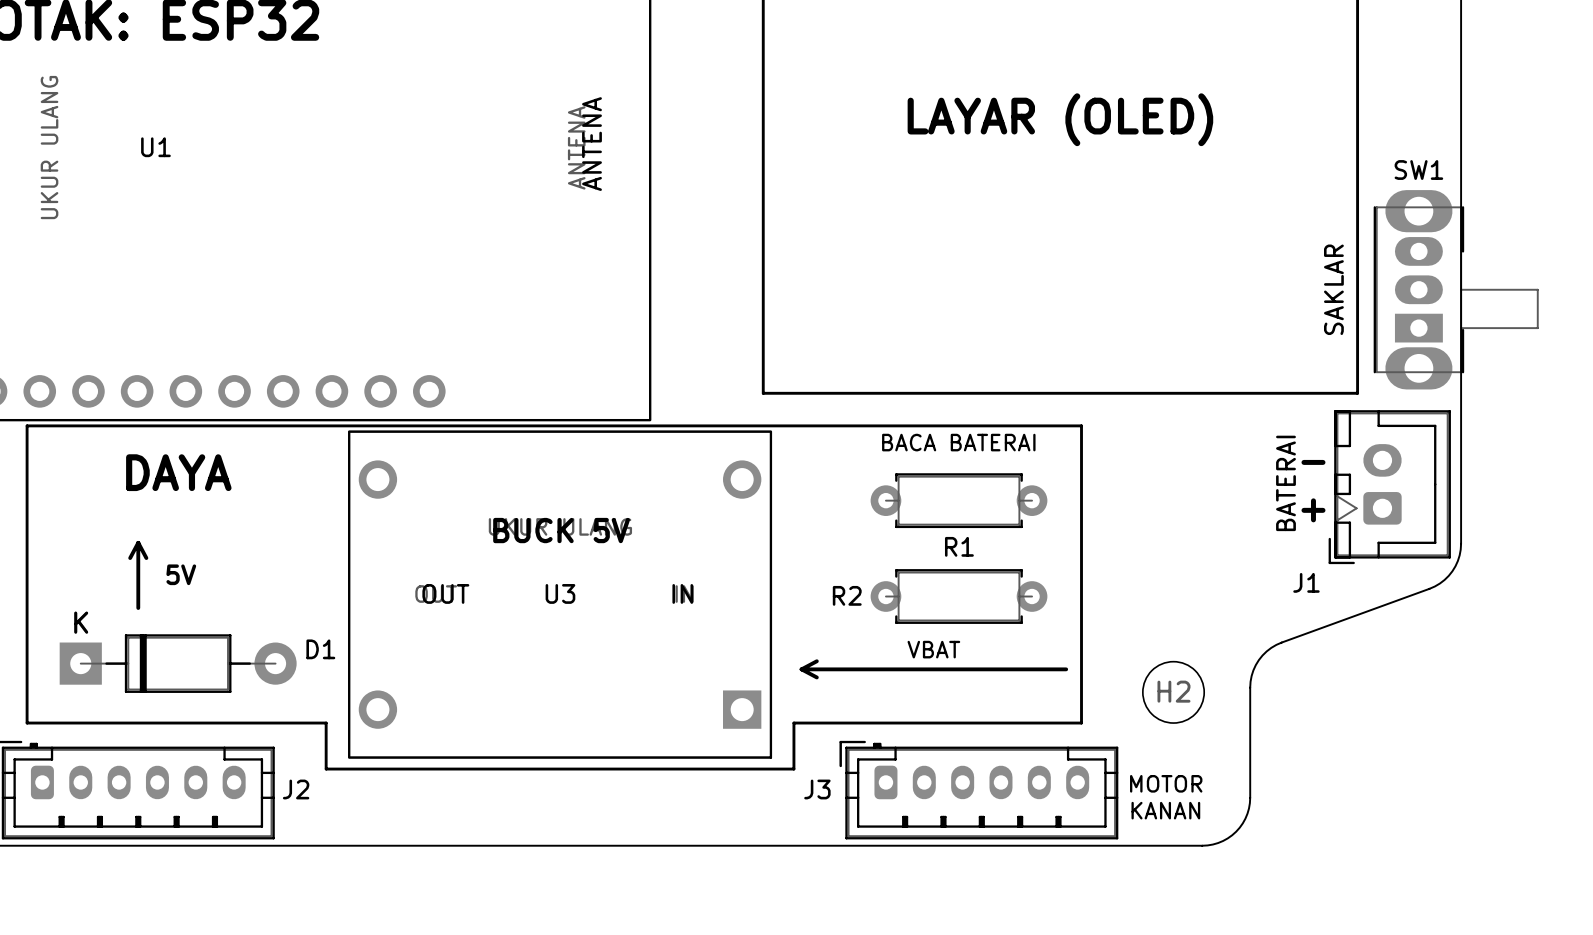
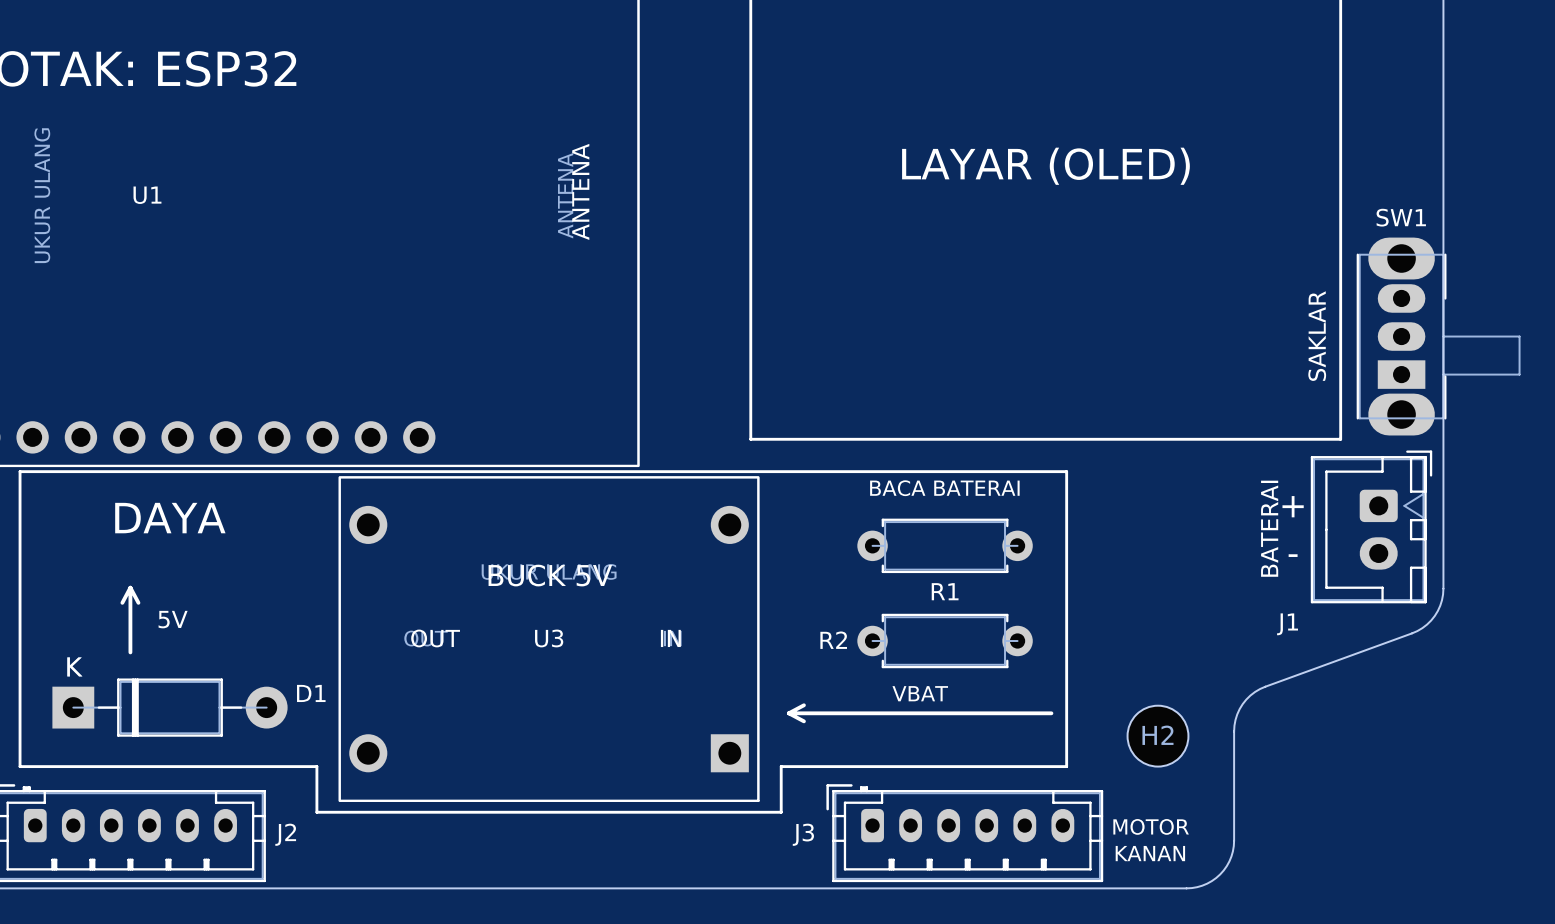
text: - (1313, 462) -> + (1293, 506)
J1 rotation: 0° (1389, 487) -> 180° (1371, 526)
text: + (1313, 510) -> - (1293, 555)

